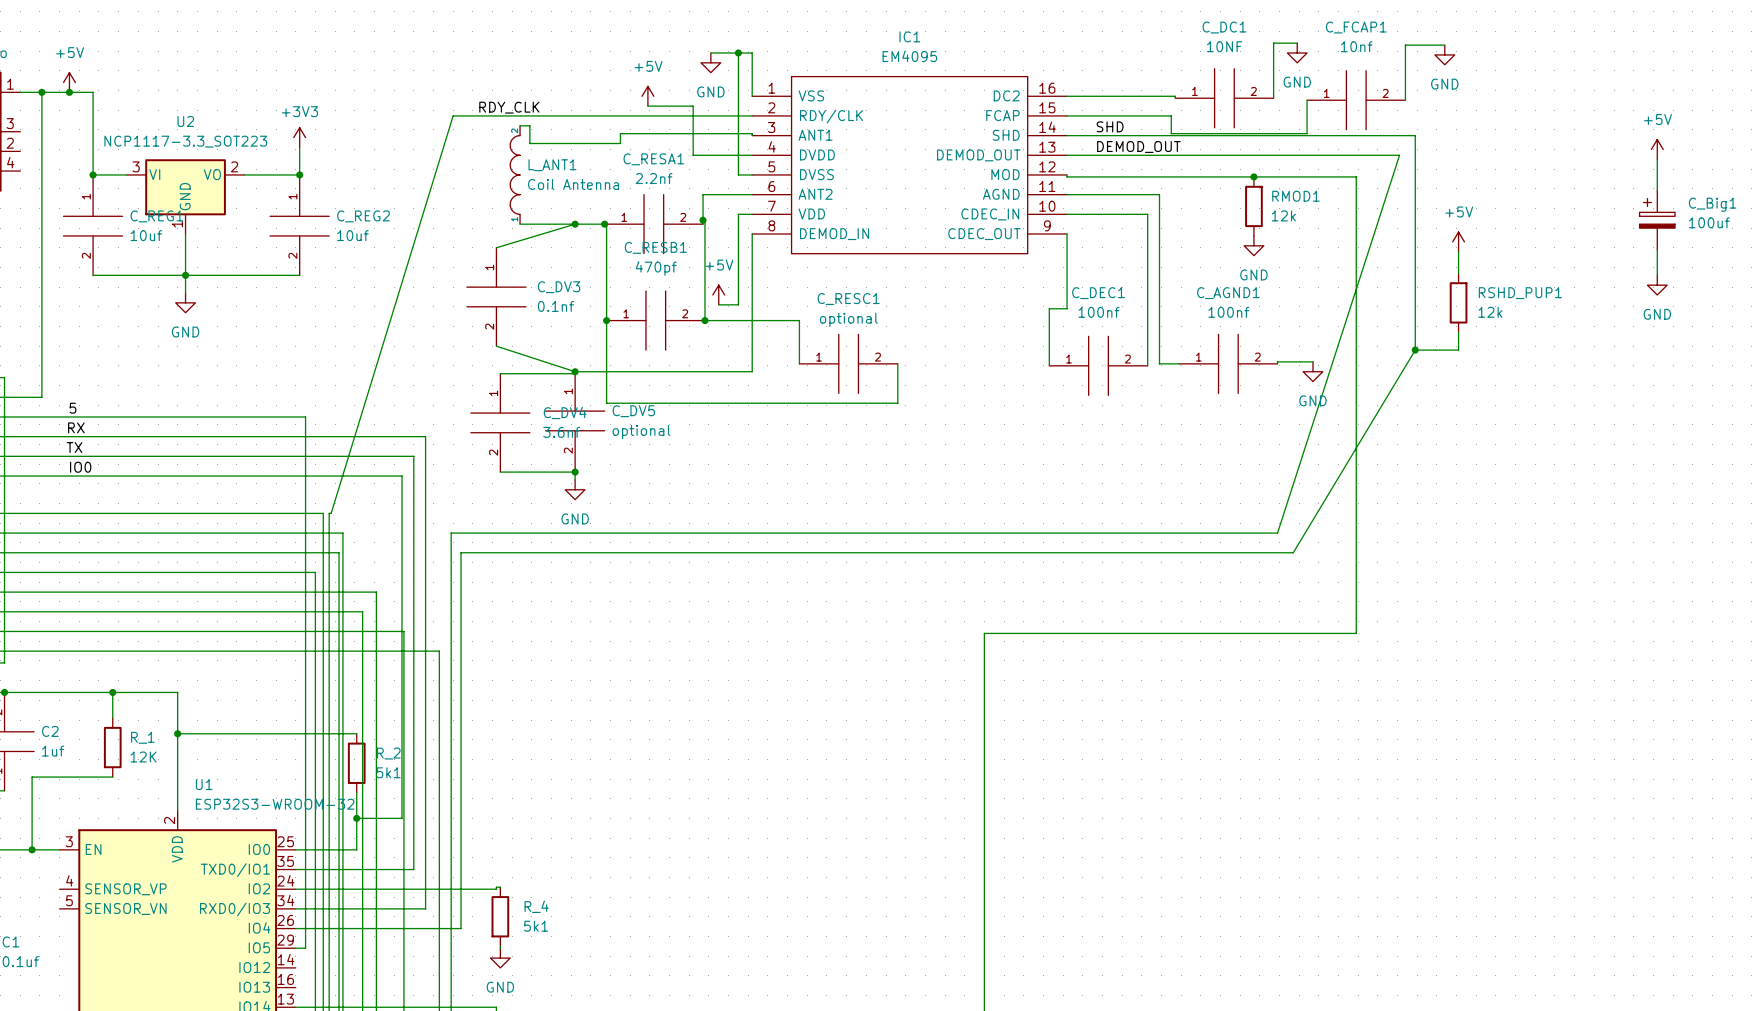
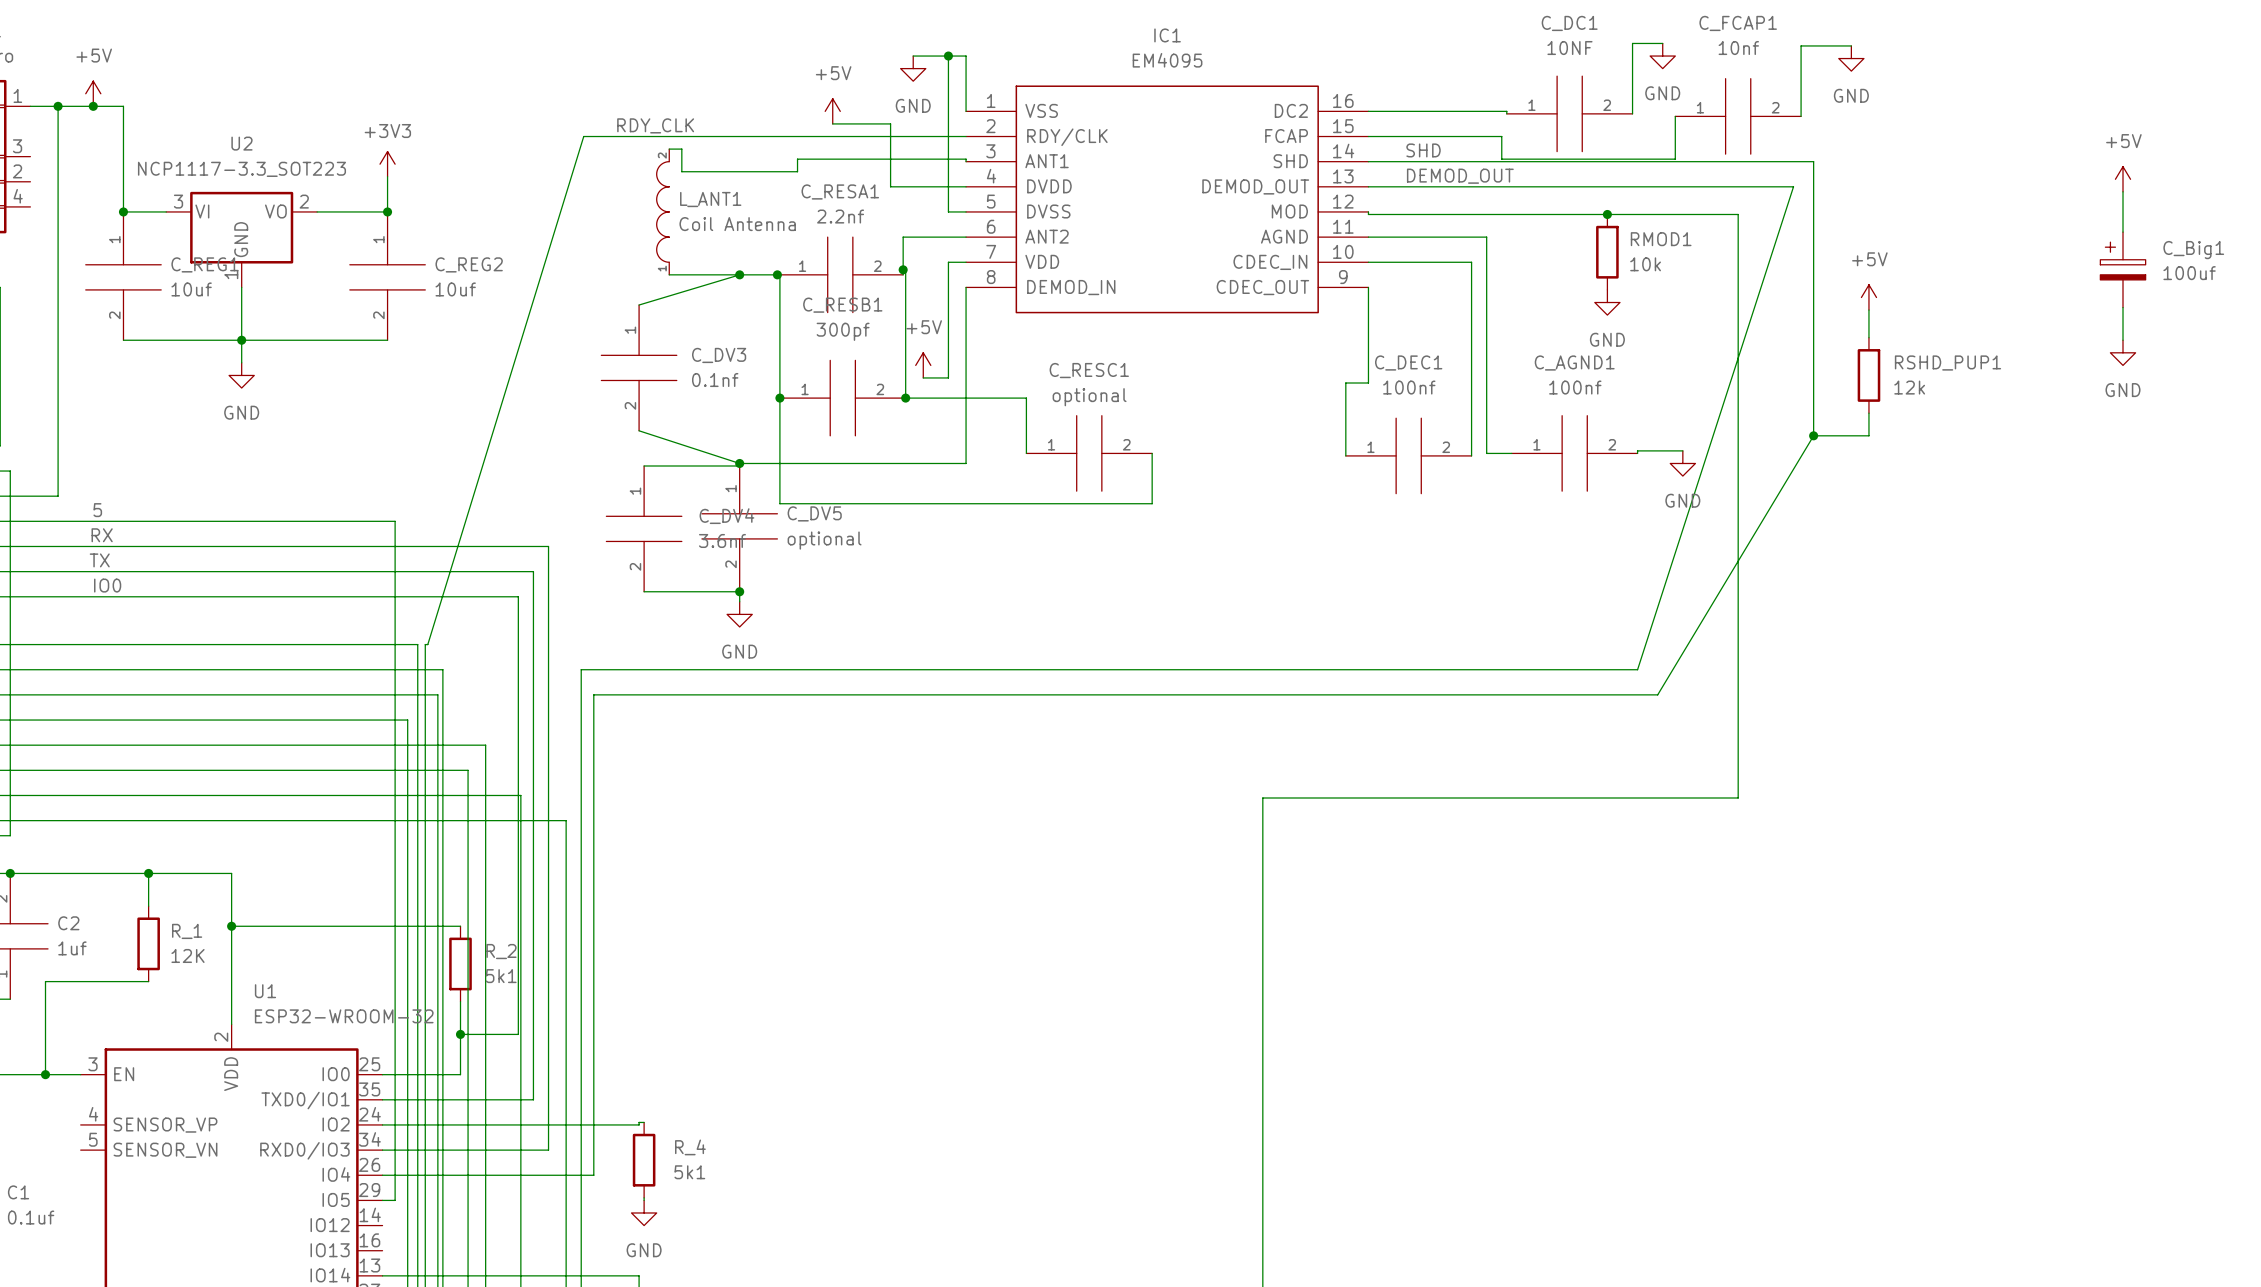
RMOD1 value: 12k (1283, 215) -> 10k (1645, 264)
C_RESB1 value: 470pf (656, 268) -> 300pf (843, 331)
U1 value: ESP32S3-WROOM-32 (275, 804) -> ESP32-WROOM-32 (344, 1016)

